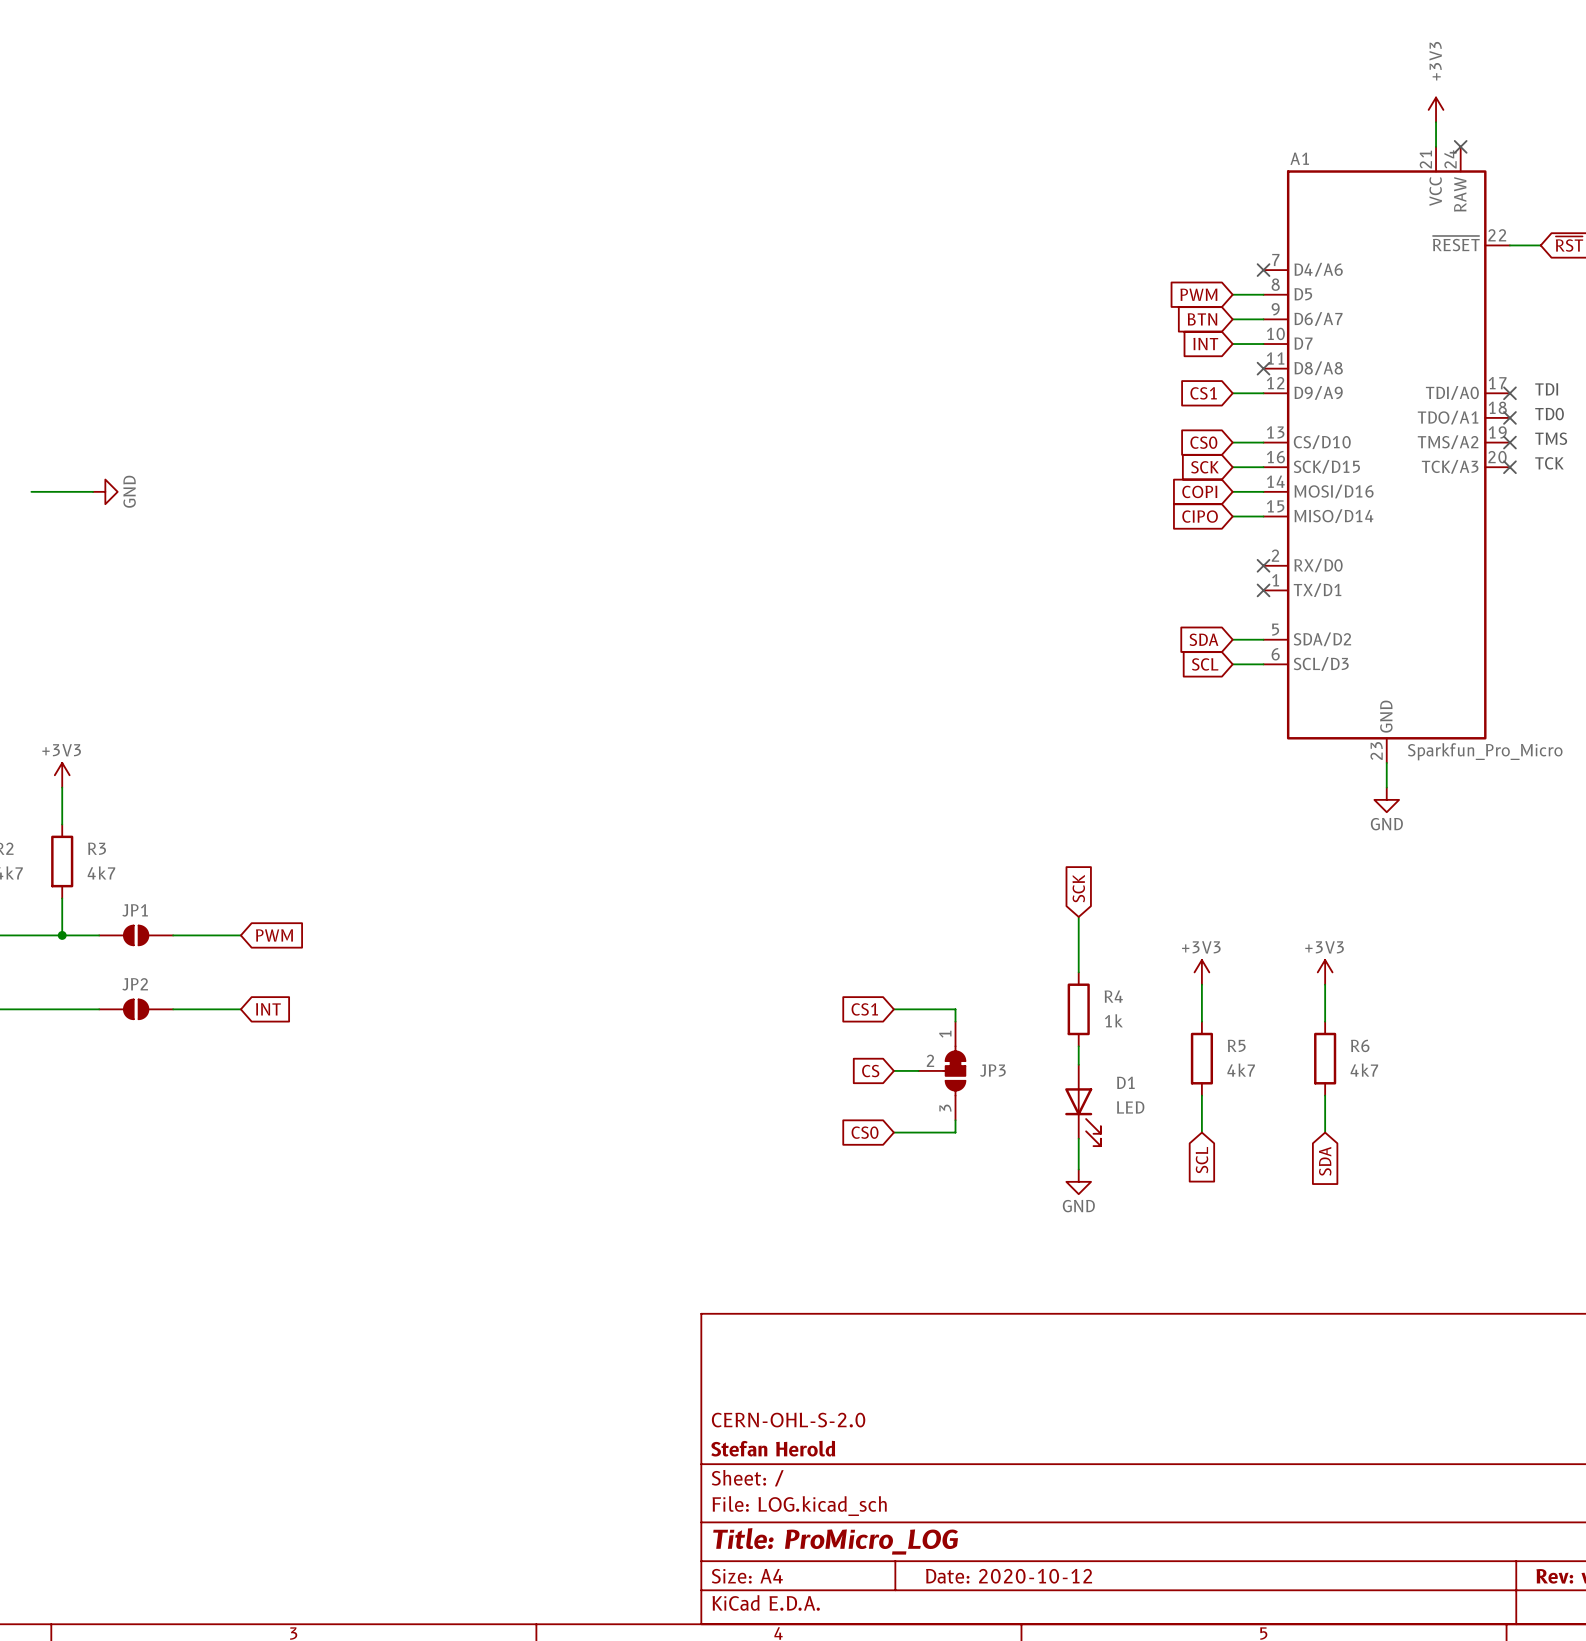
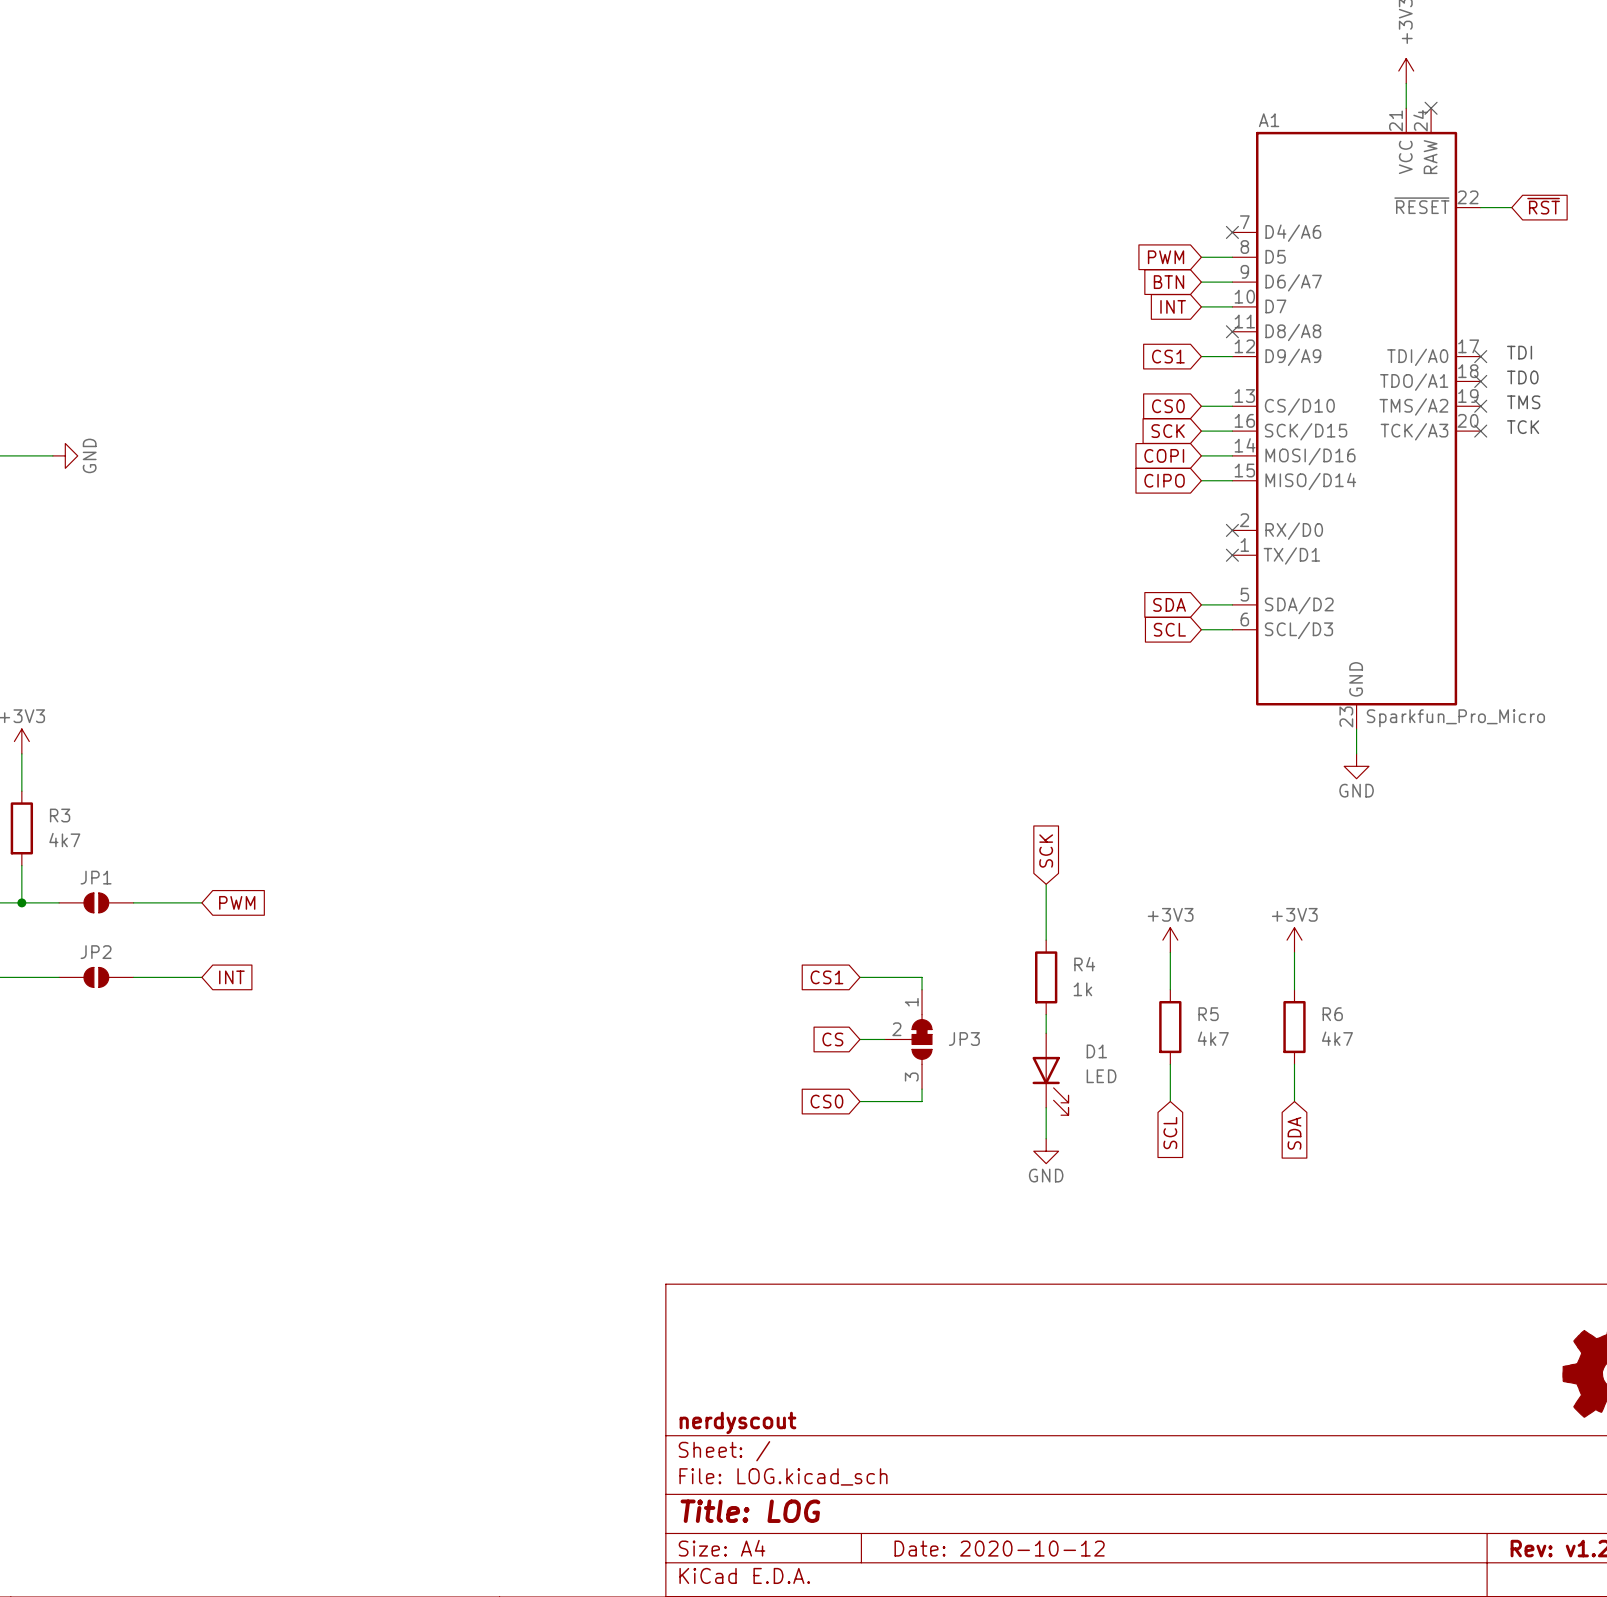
title block: CERN-OHL-S-2.0 (788, 1420) -> none
title block: Stefan Herold (773, 1448) -> nerdyscout (737, 1422)
title block: Title: ProMicro_LOG (835, 1541) -> Title: LOG (750, 1511)

